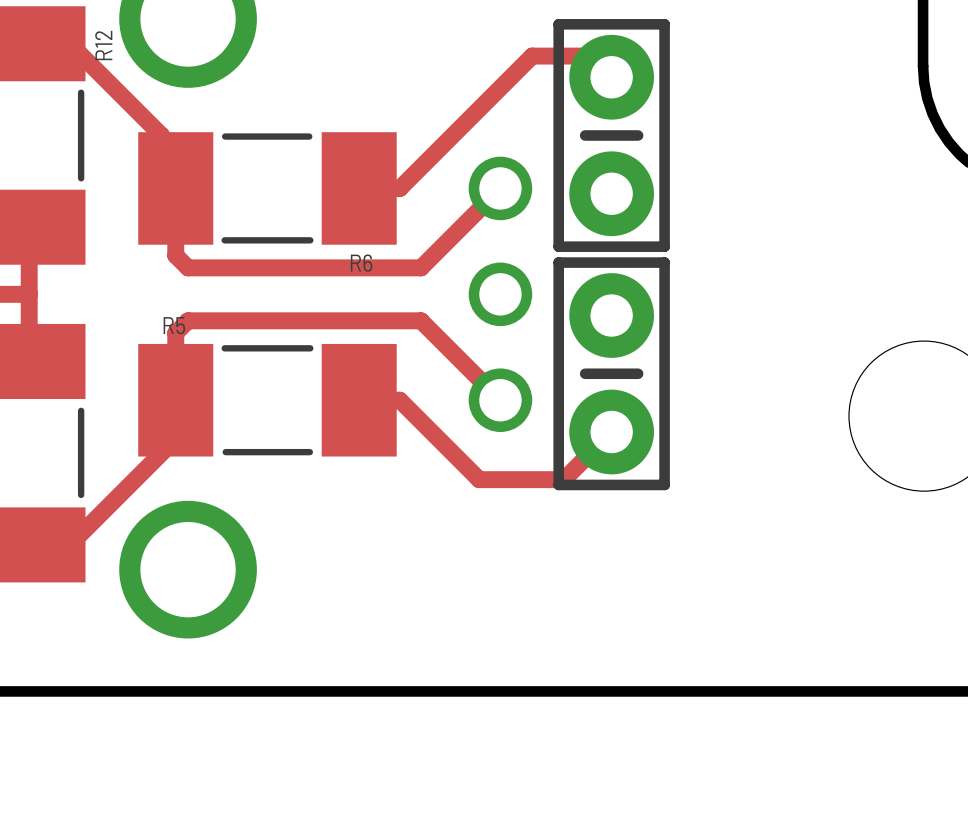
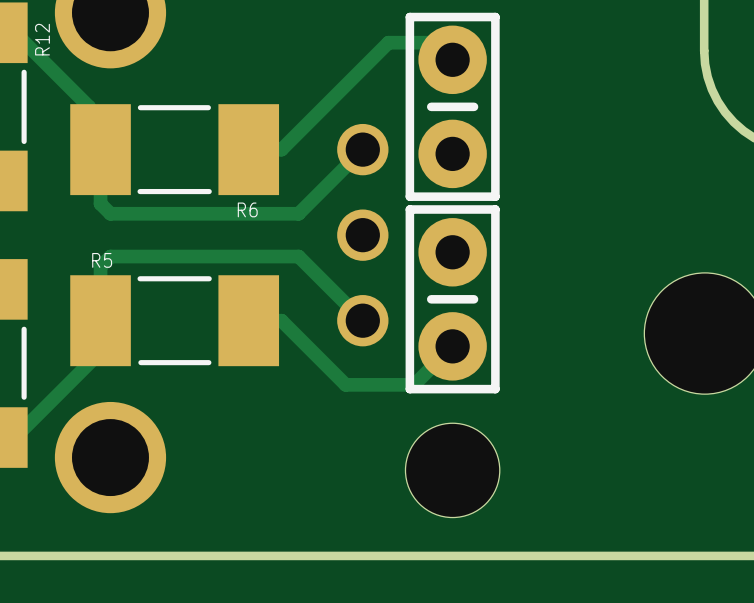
hole: none -> (452, 470)

